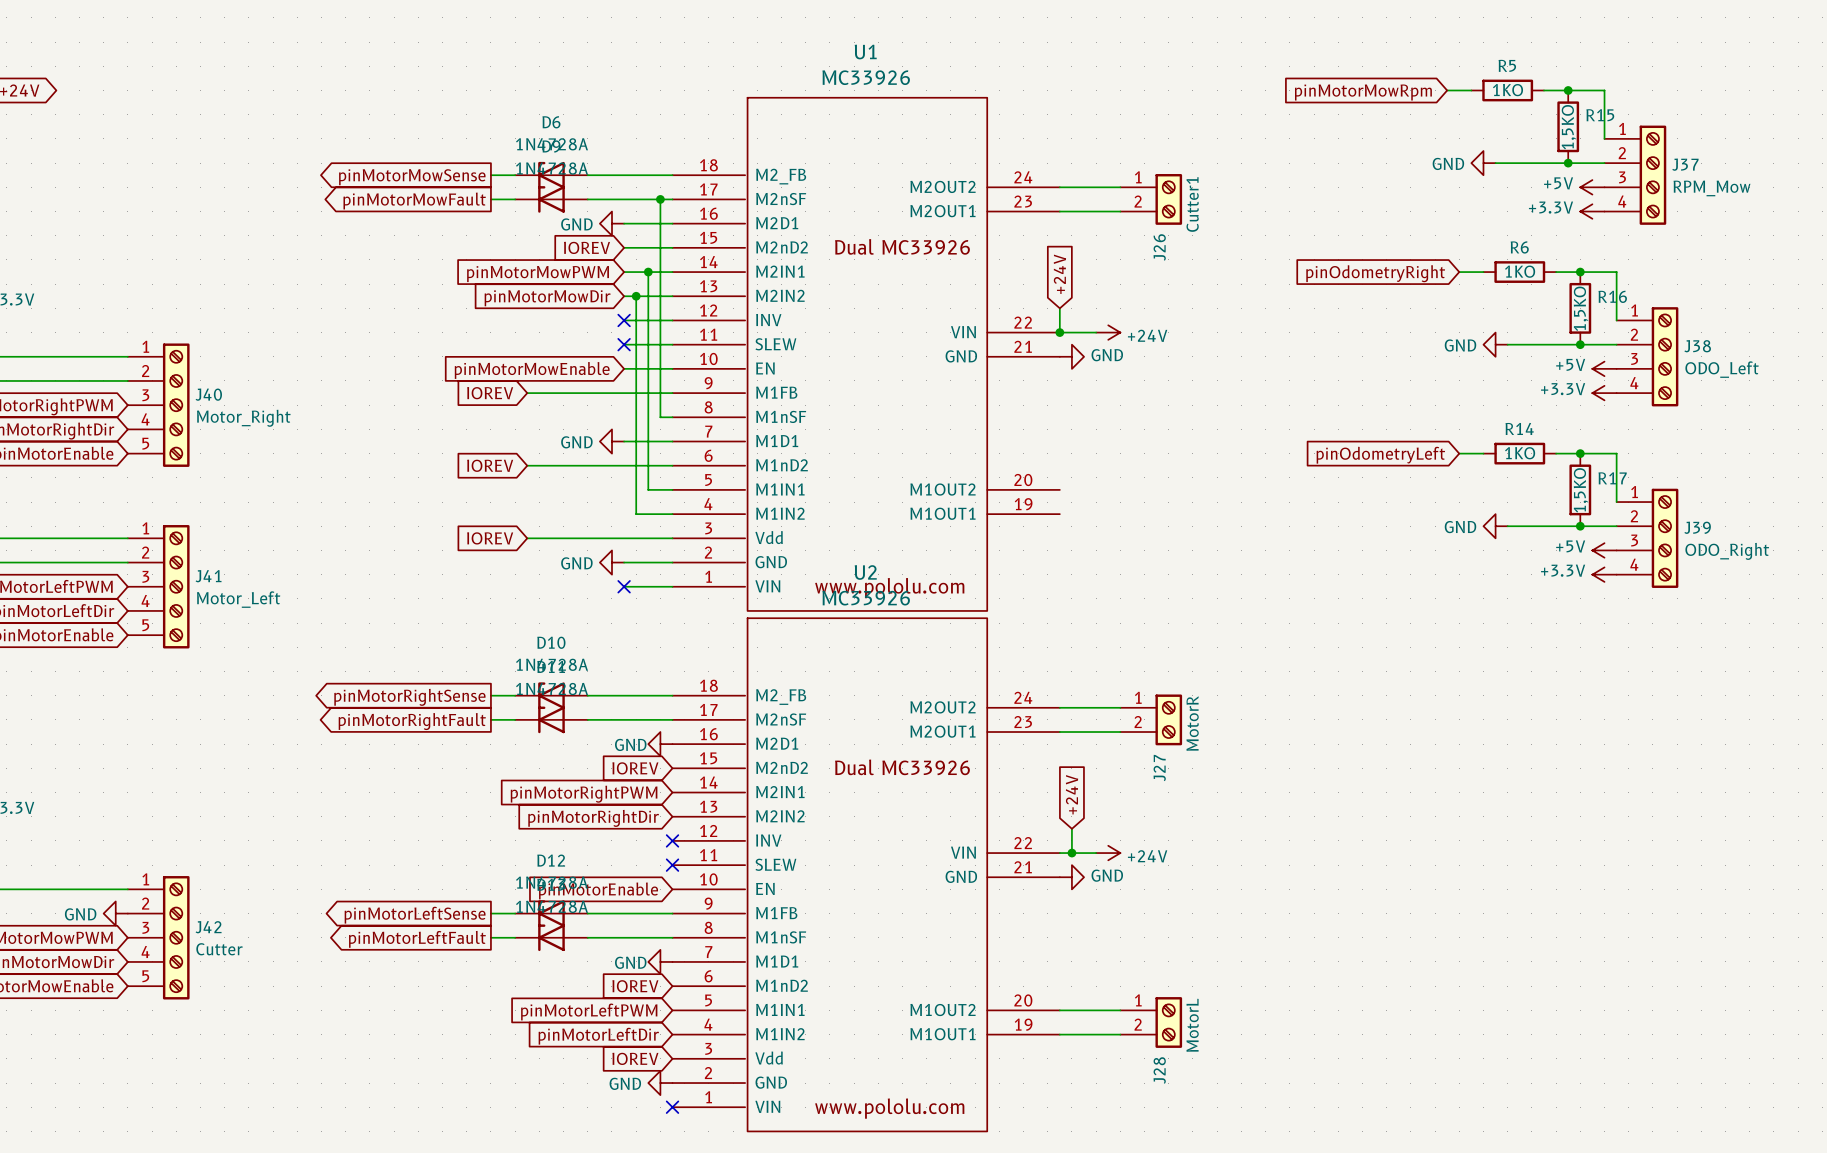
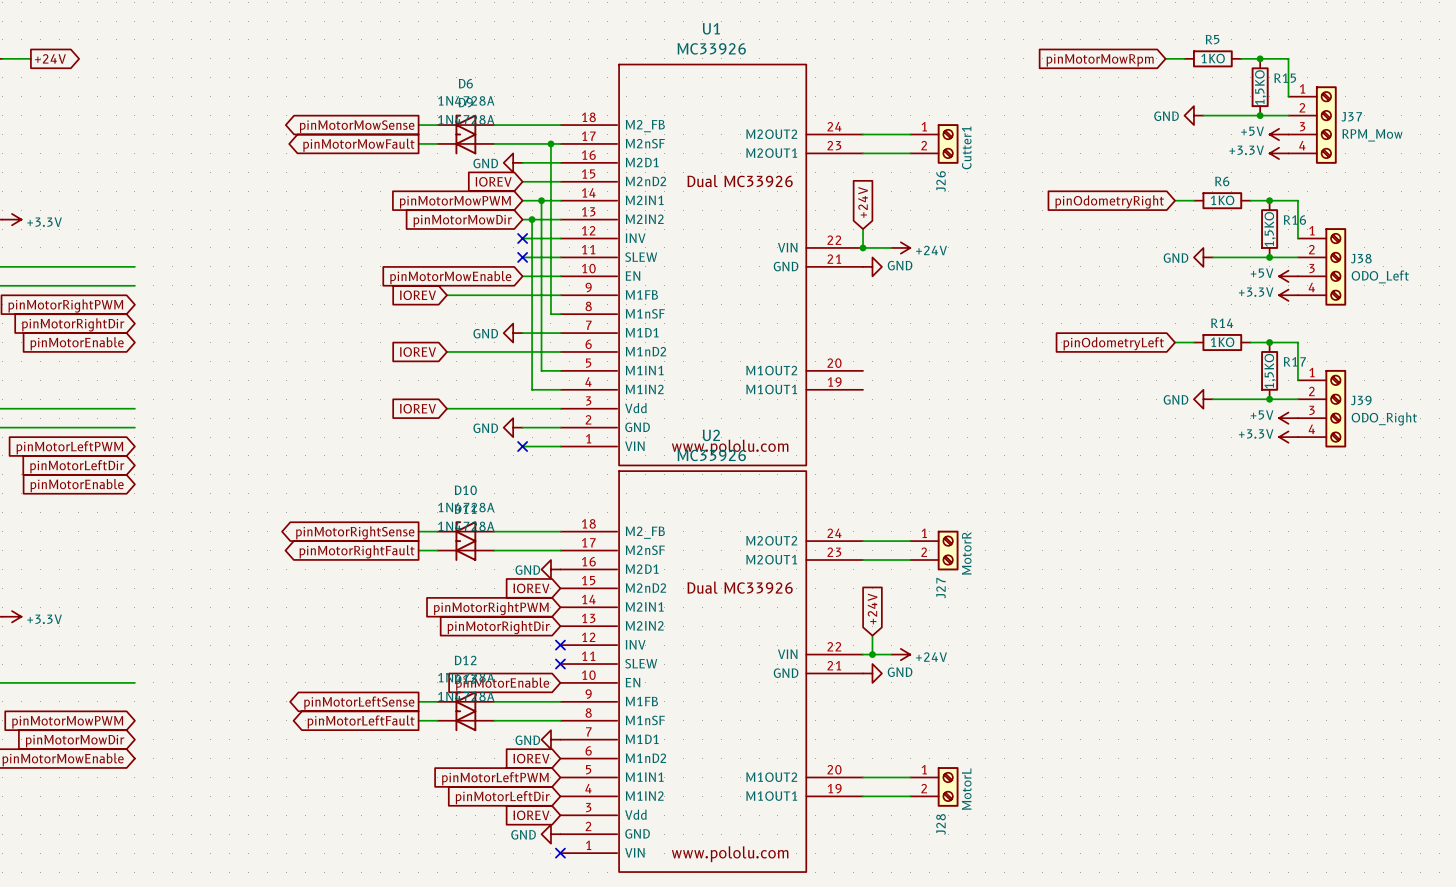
J40: Motor_Right (158, 405) -> none
J41: Motor_Left (158, 586) -> none
power symbol: GND (115, 913) -> none
J42: Cutter (158, 937) -> none

